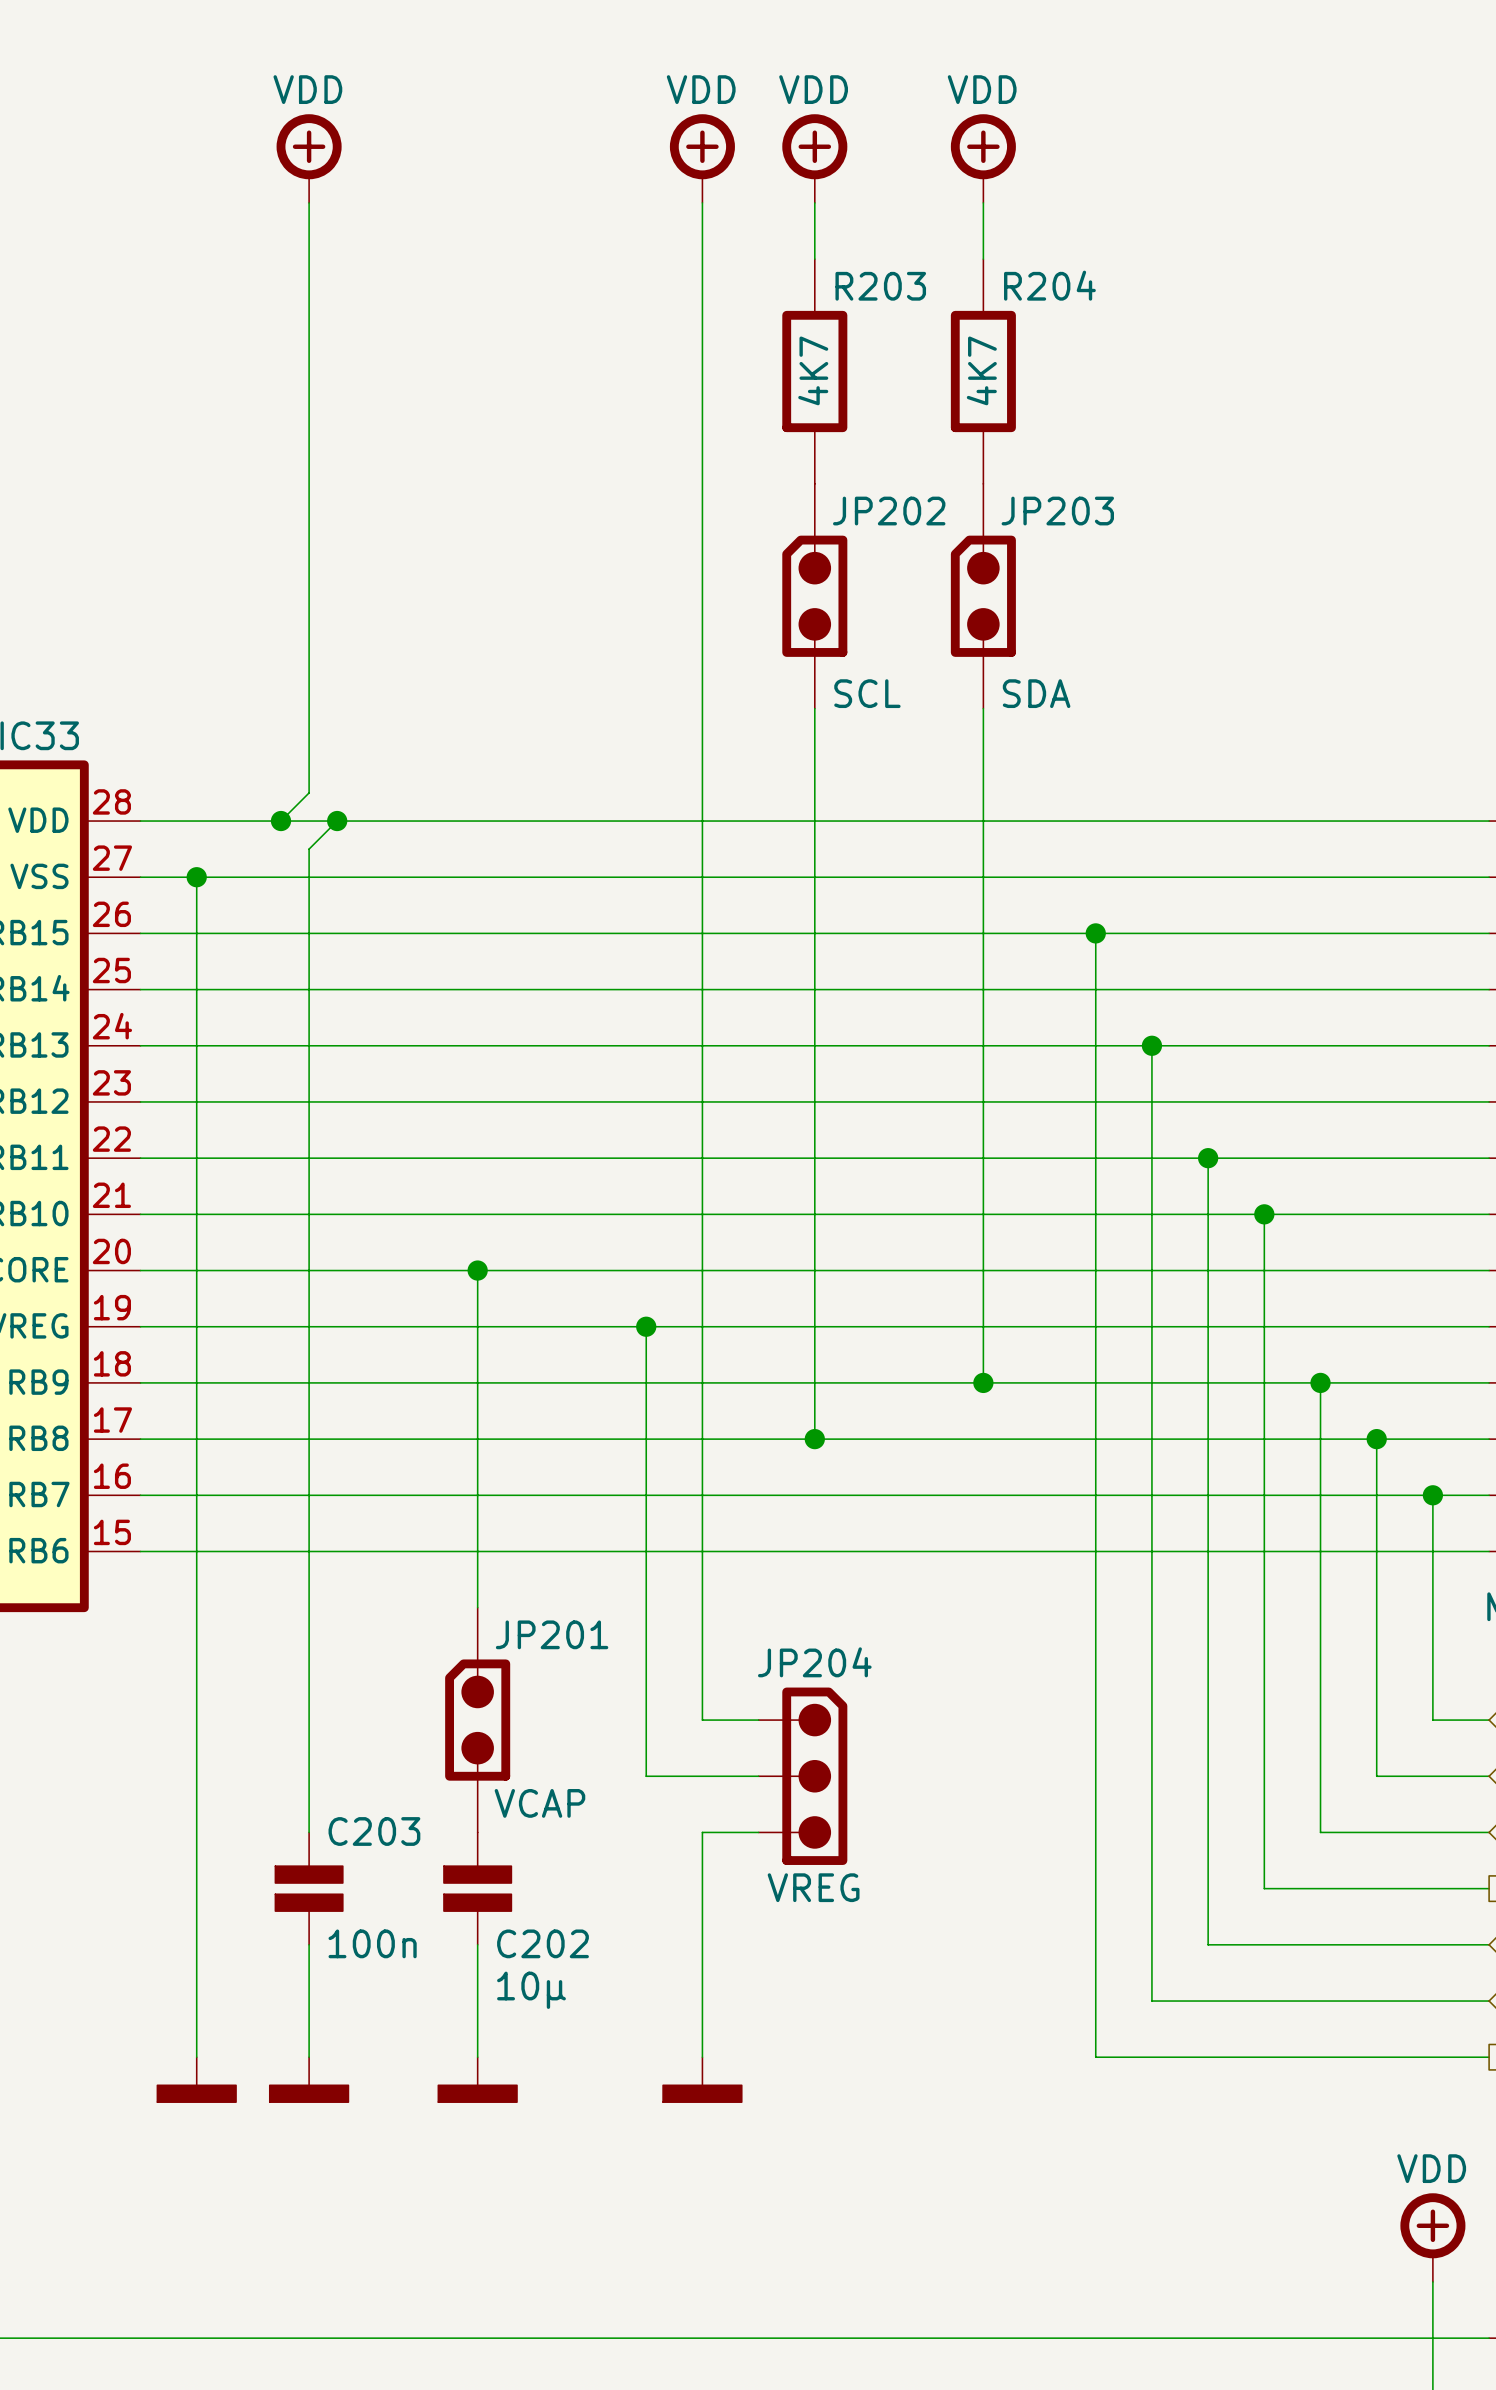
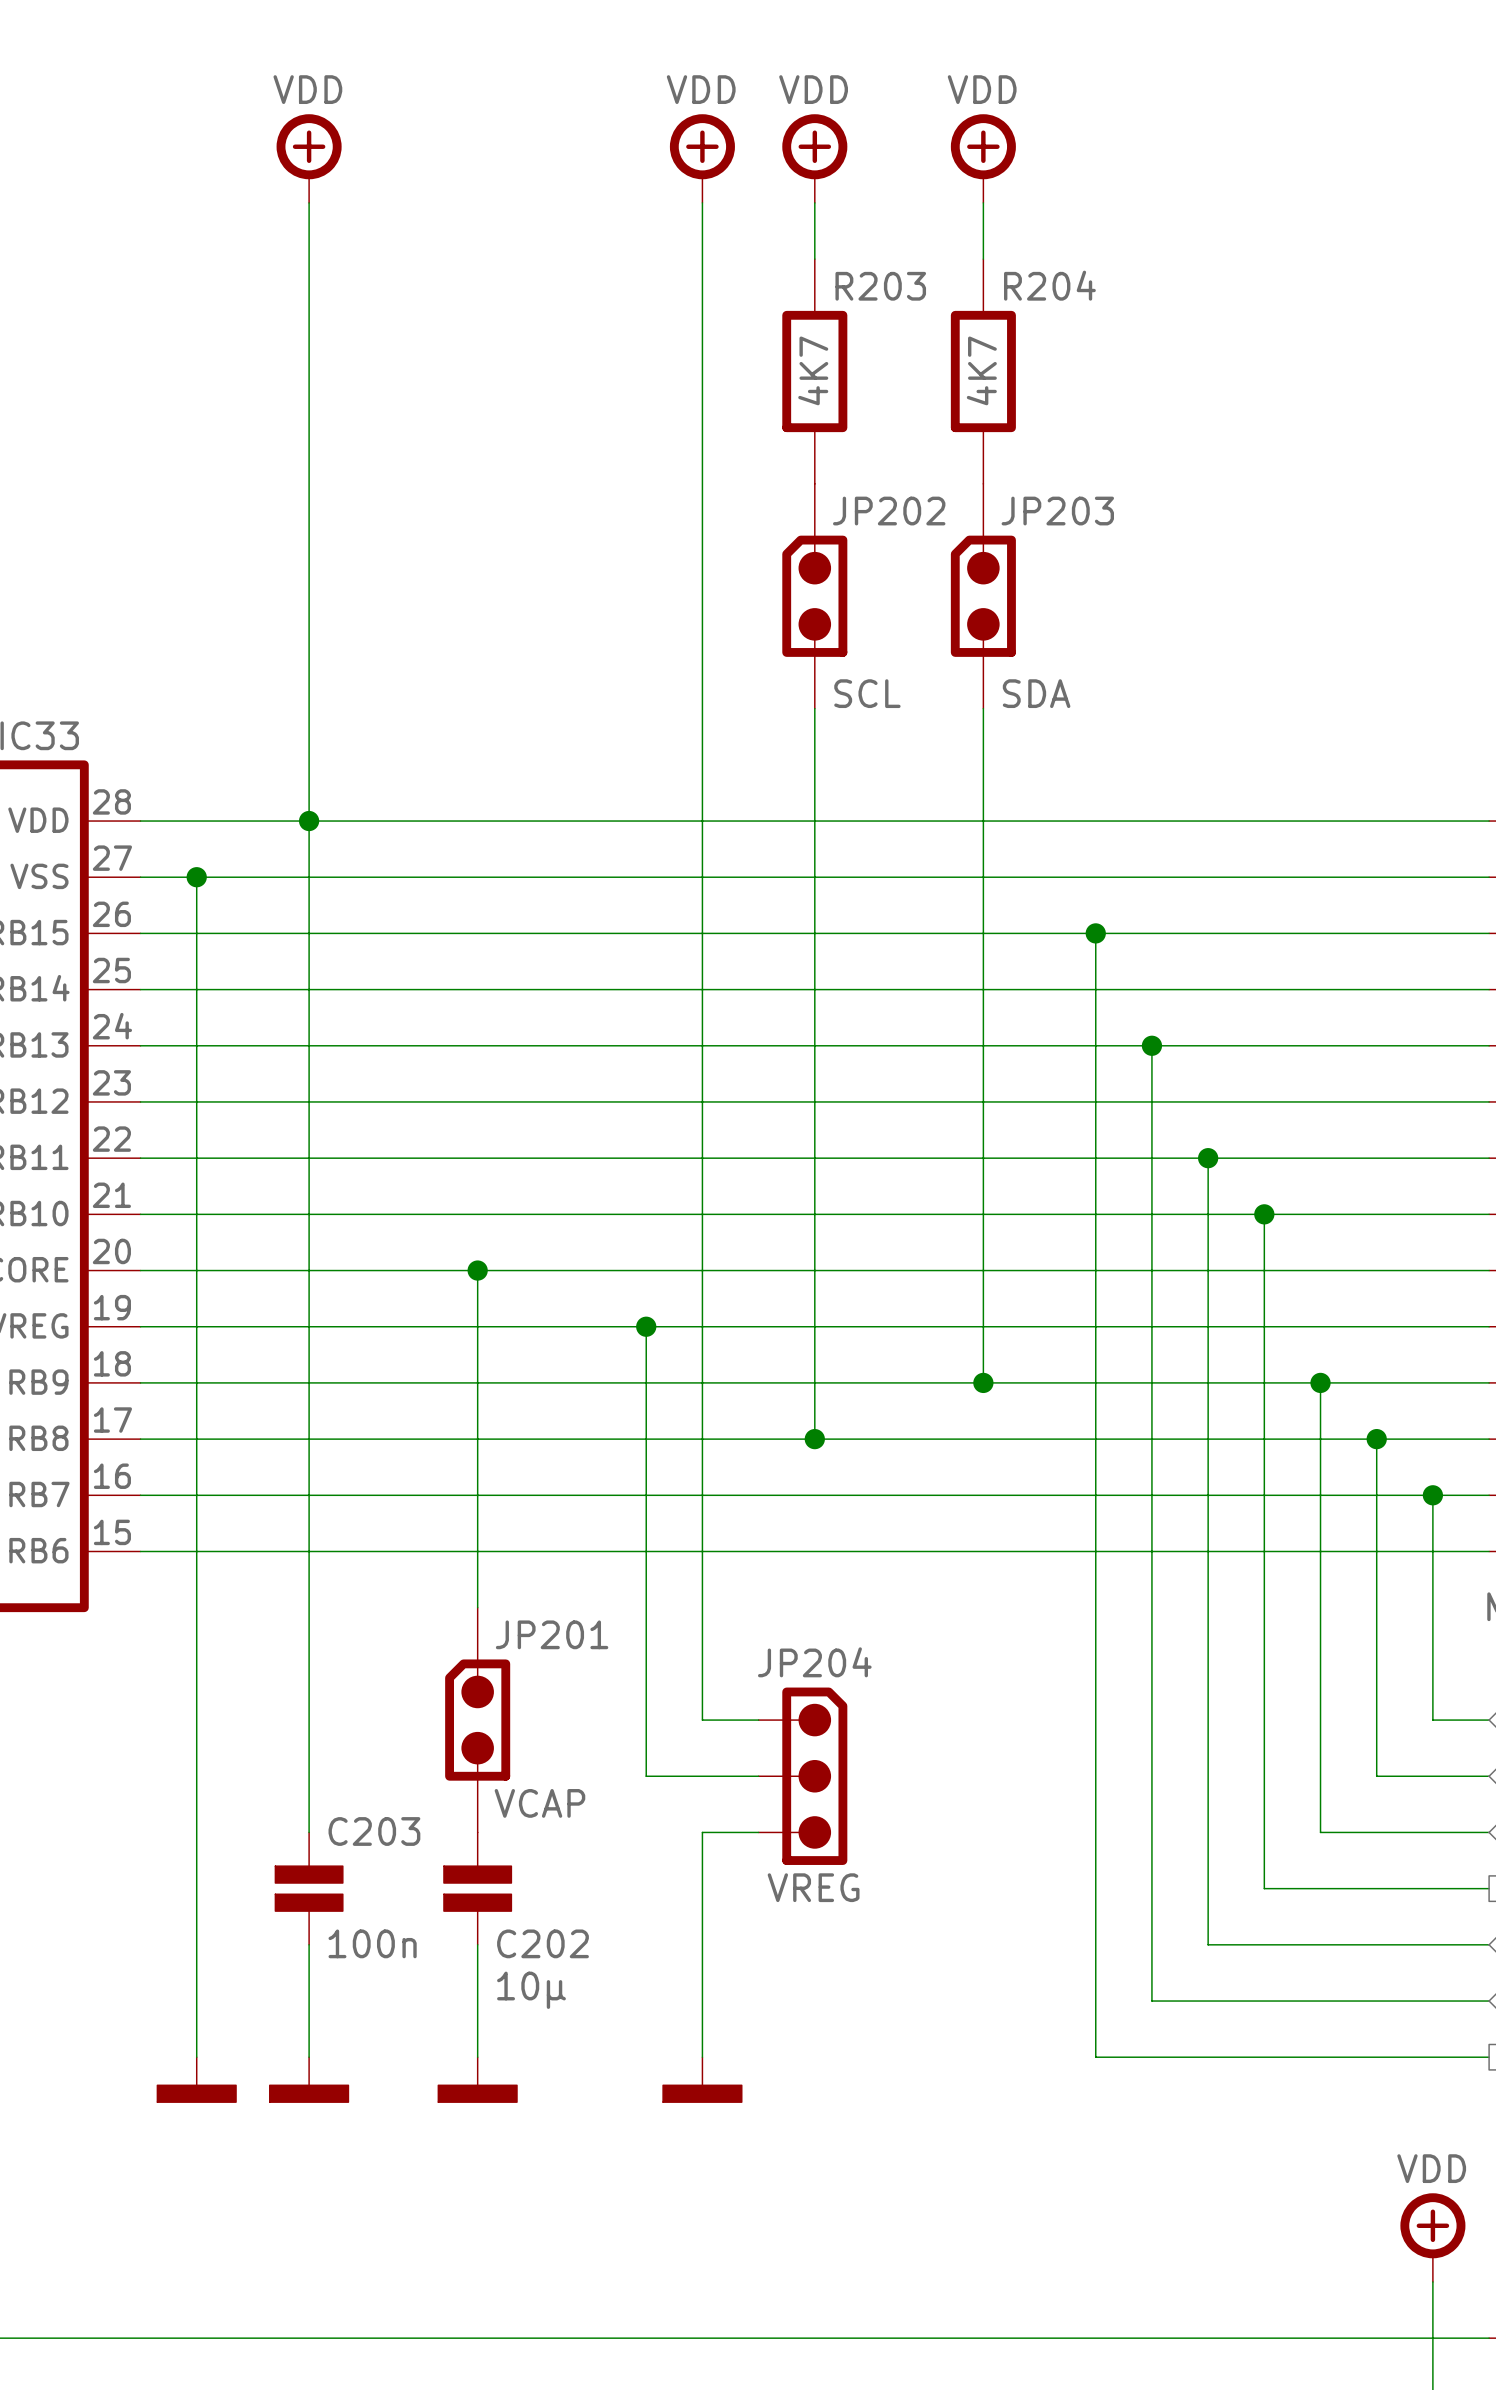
wire: (309, 792) (281, 821) -> (309, 792) (309, 849)
junction: (281, 821) -> none
junction: none -> (309, 821)
wire: (337, 821) (309, 849) -> none
junction: (337, 821) -> none

